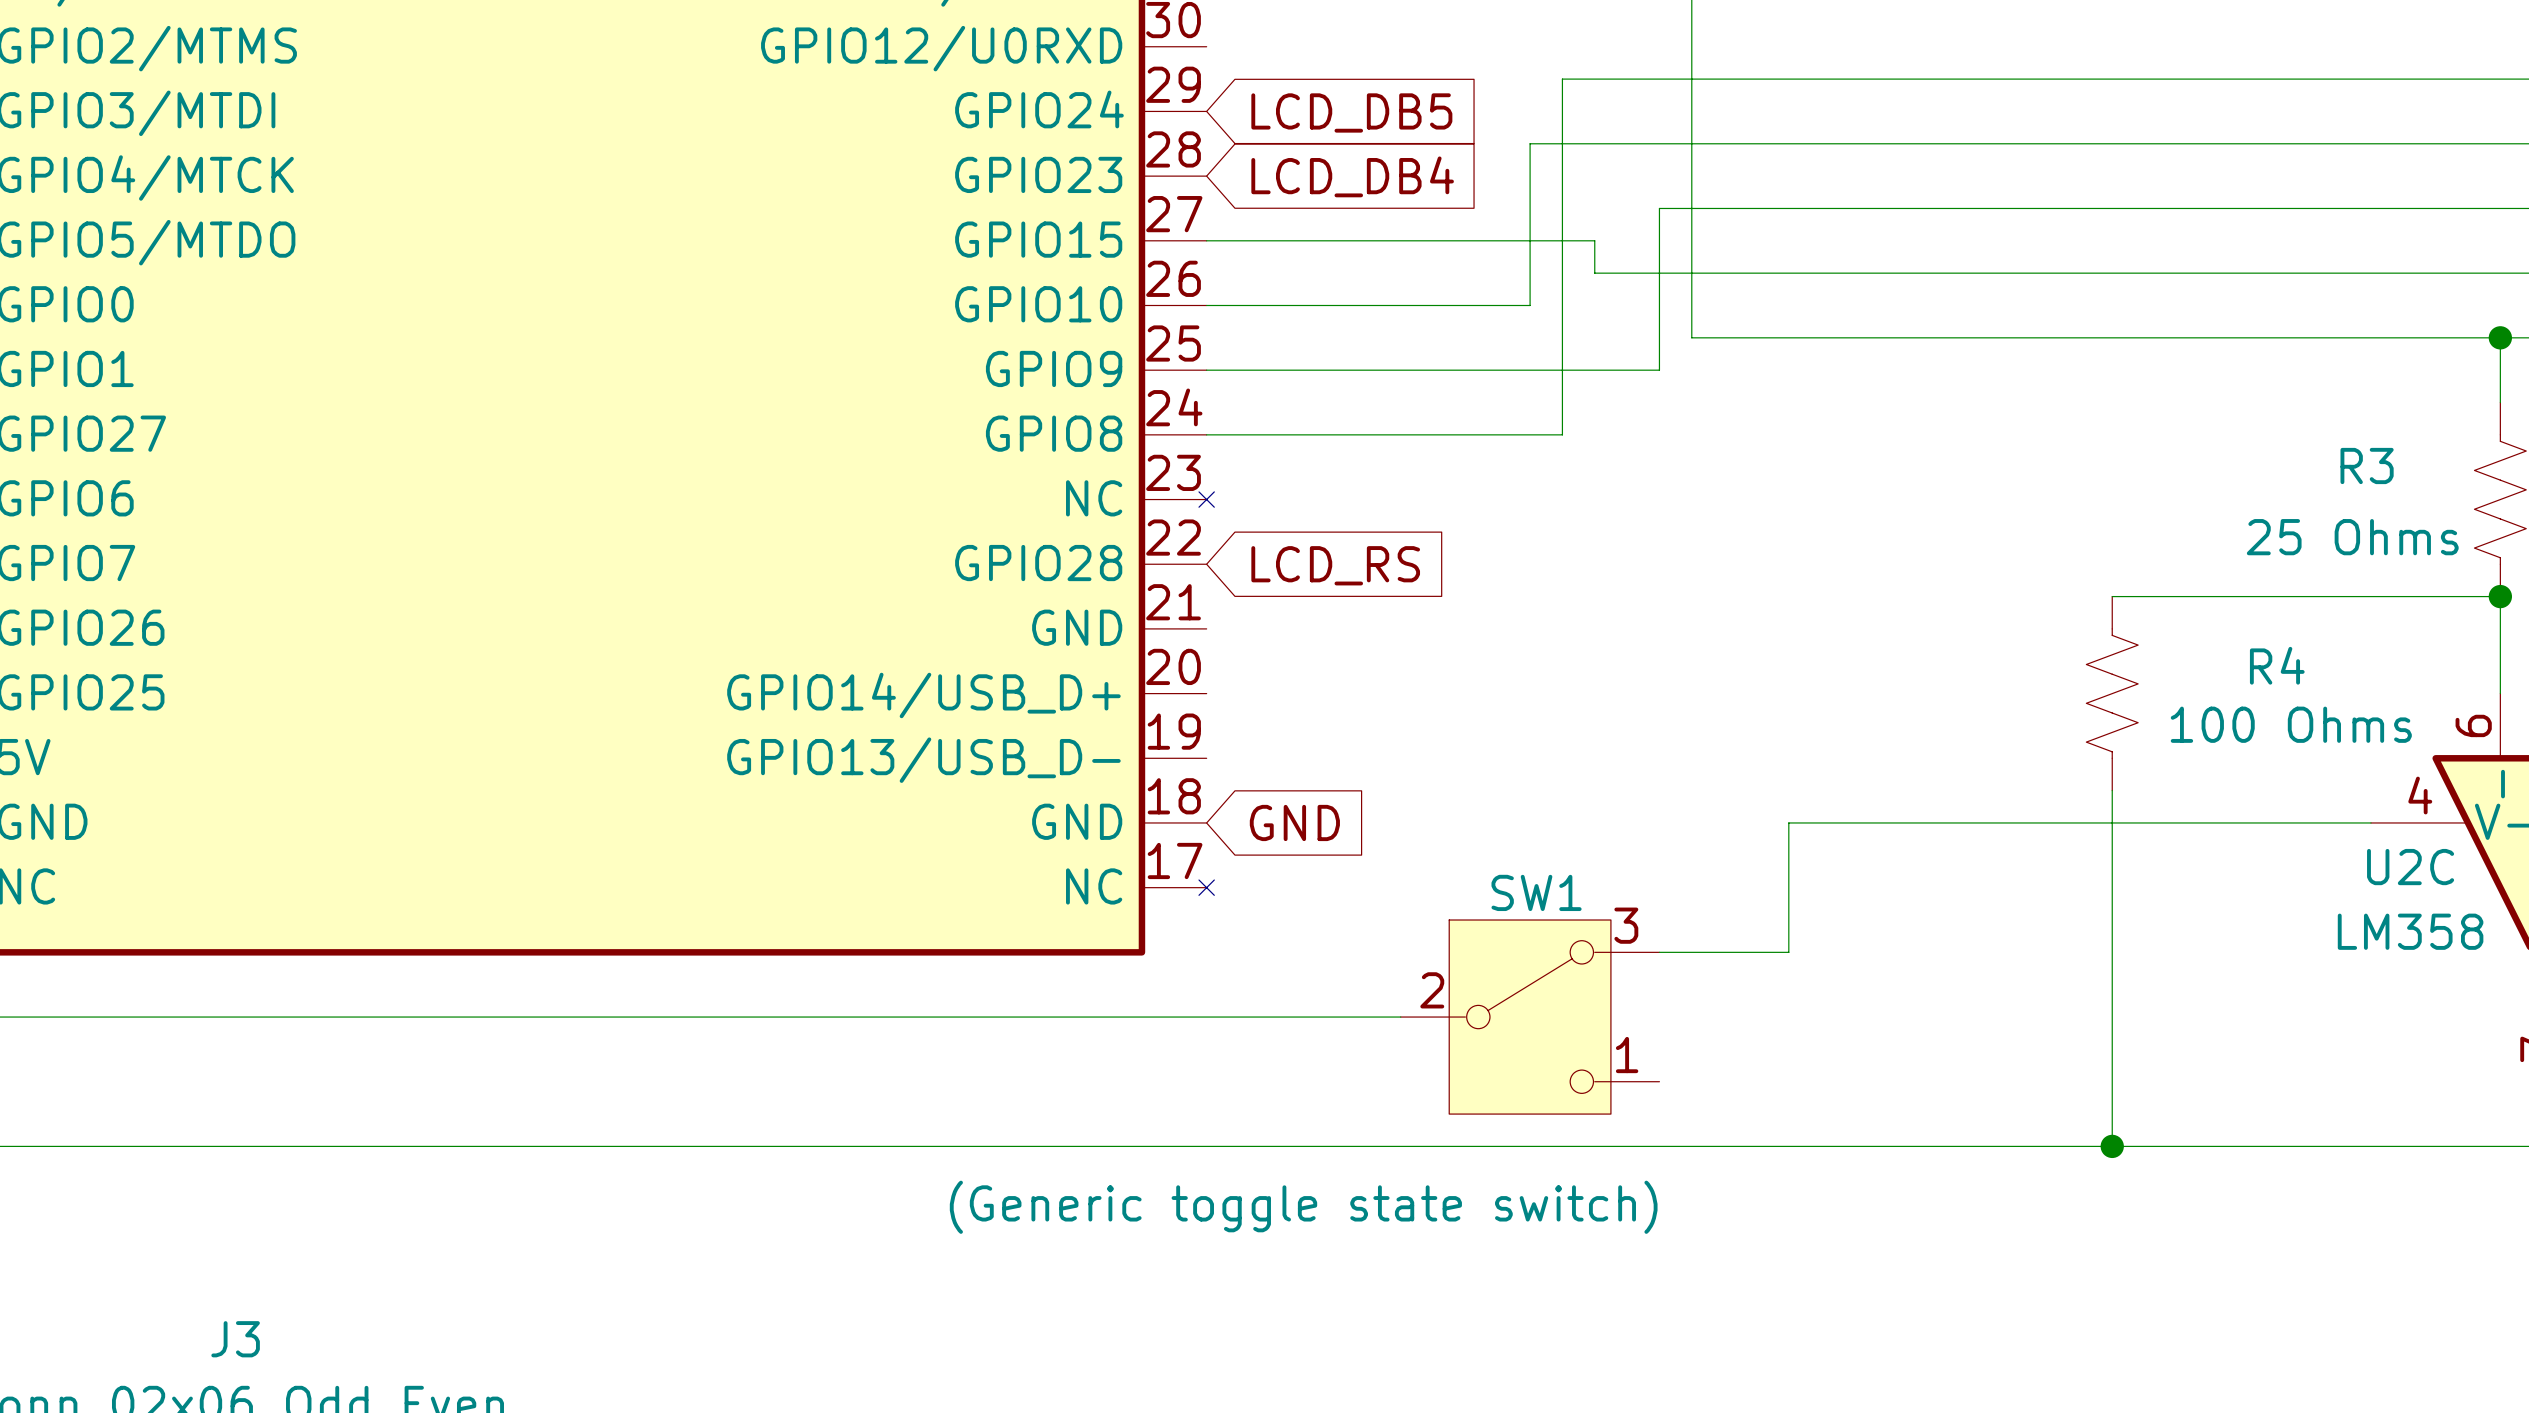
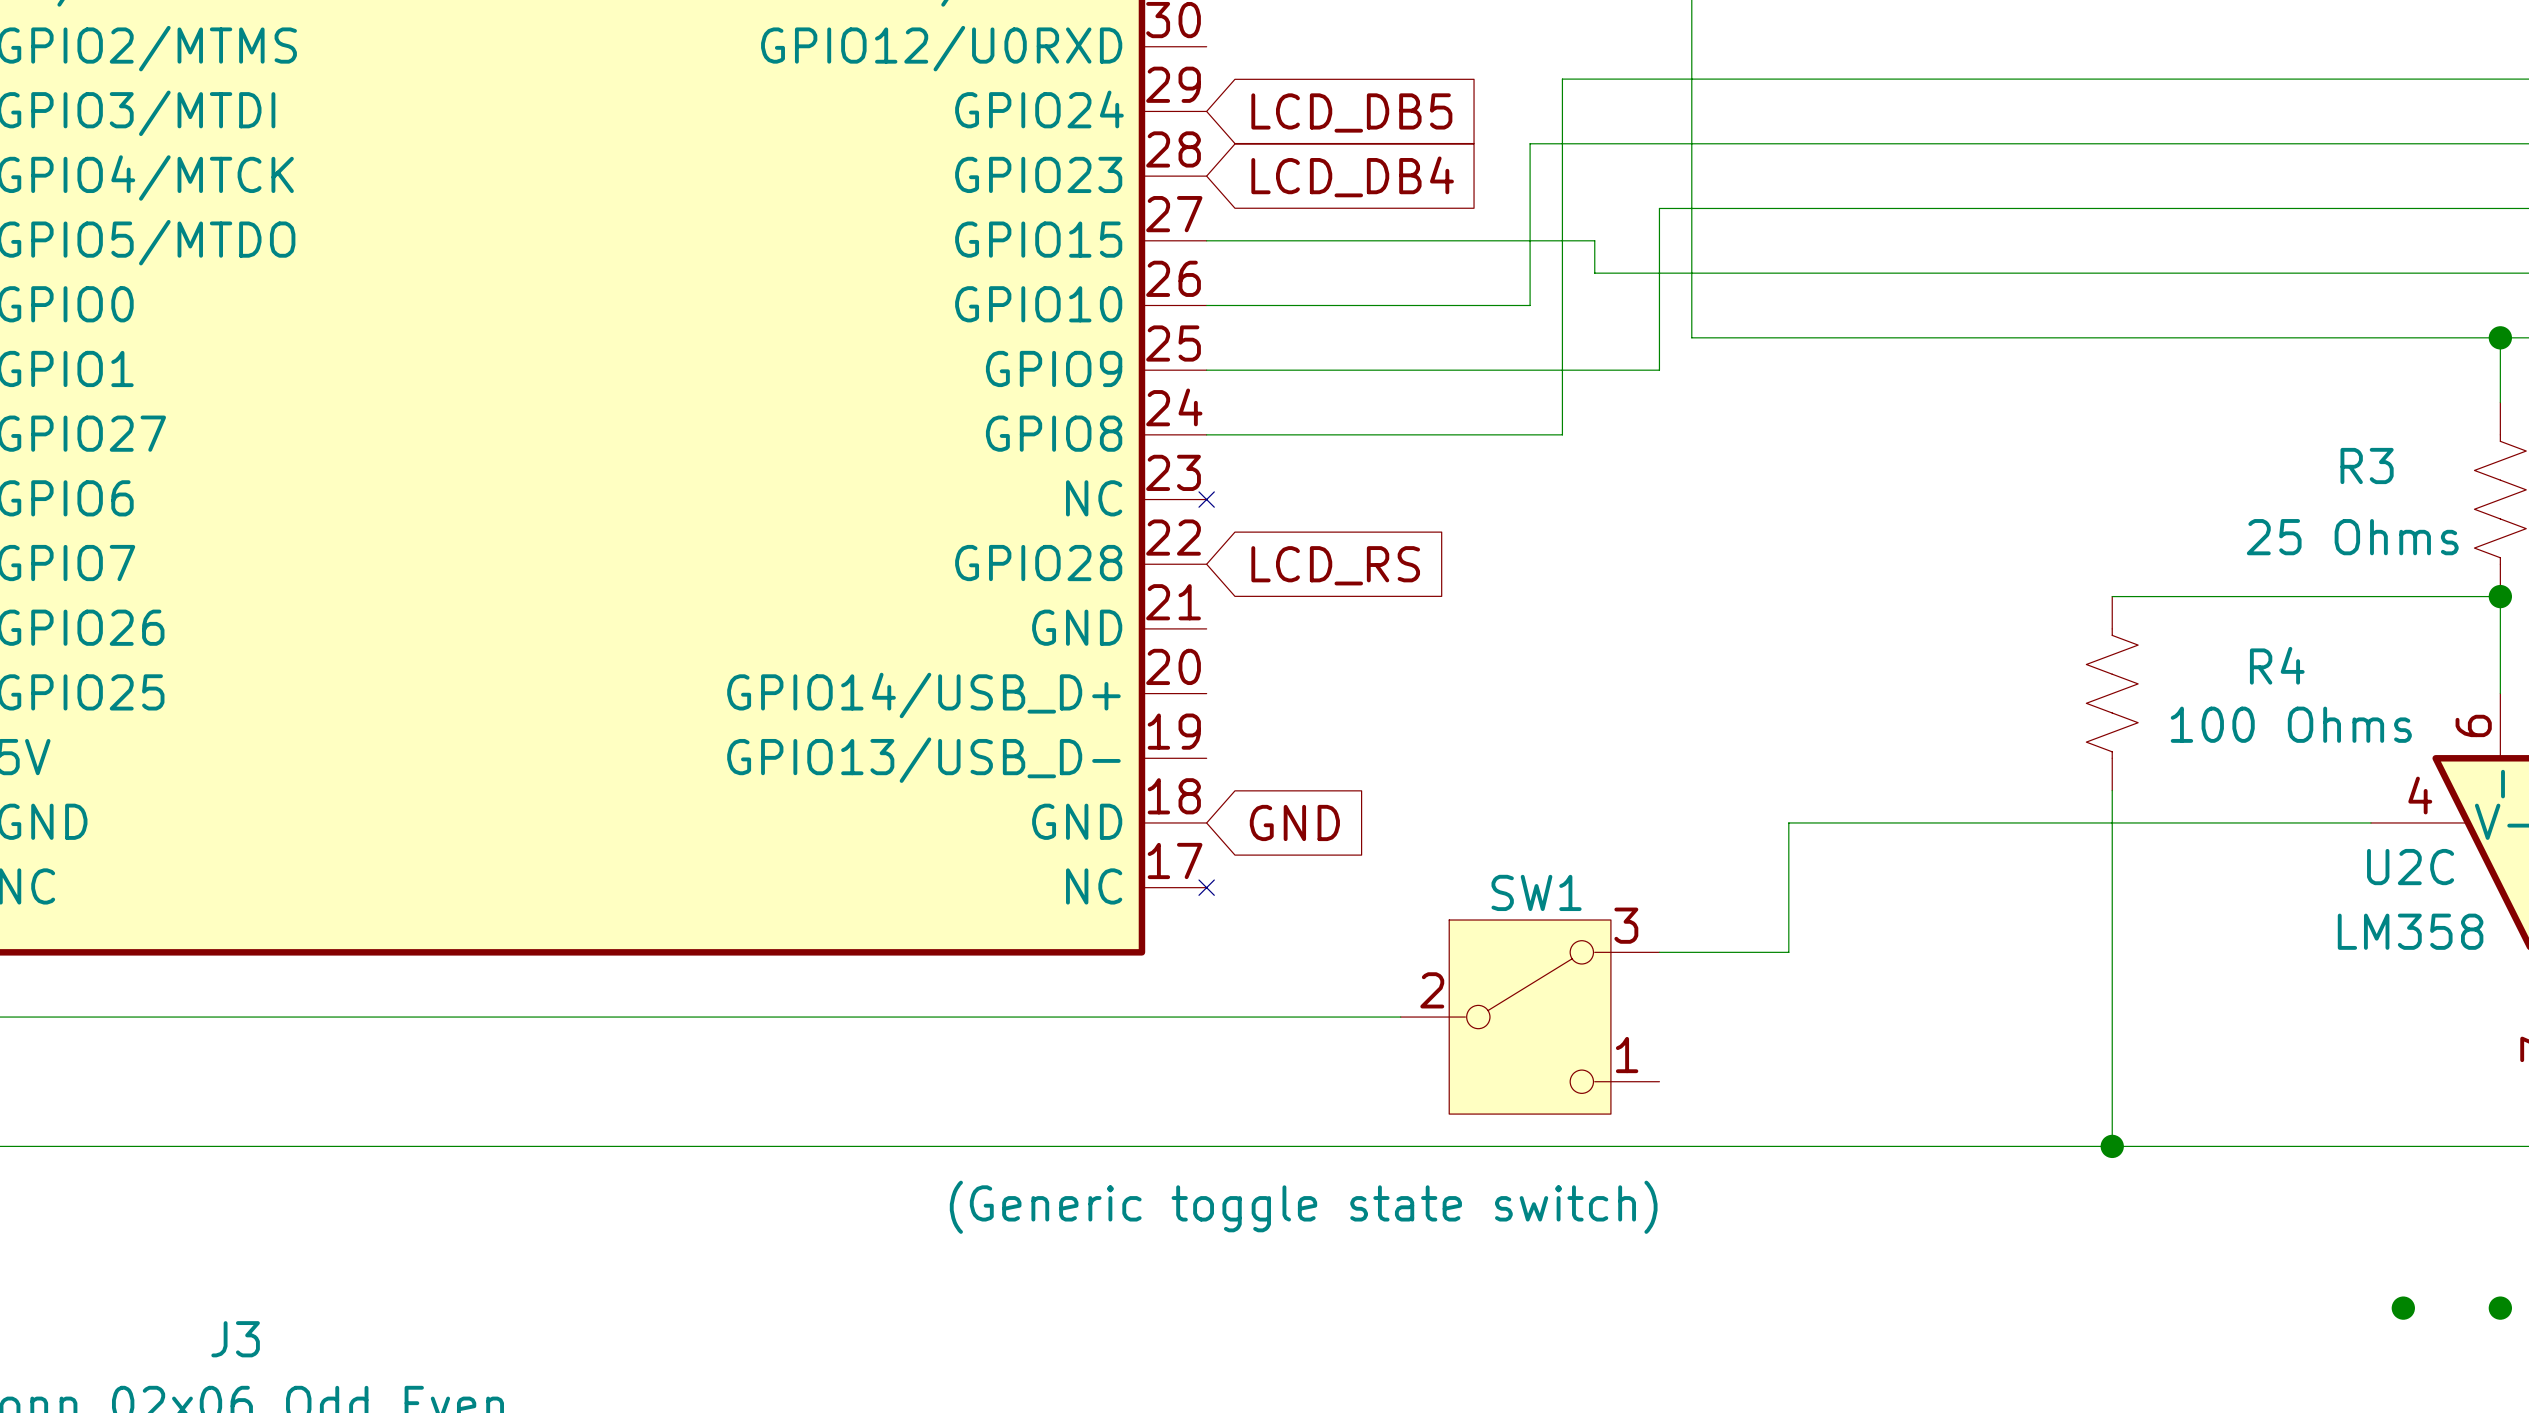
junction: none -> (2403, 1308)
junction: none -> (2500, 1308)

